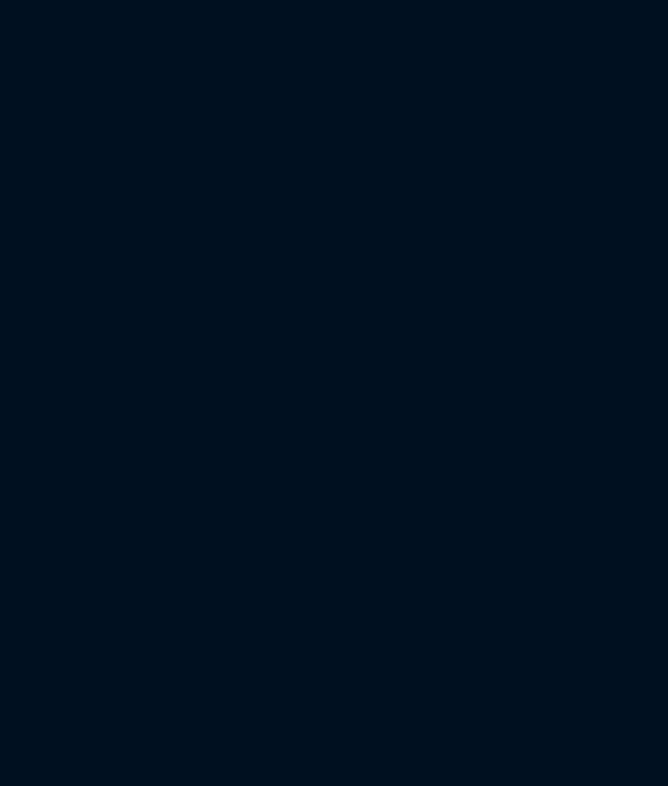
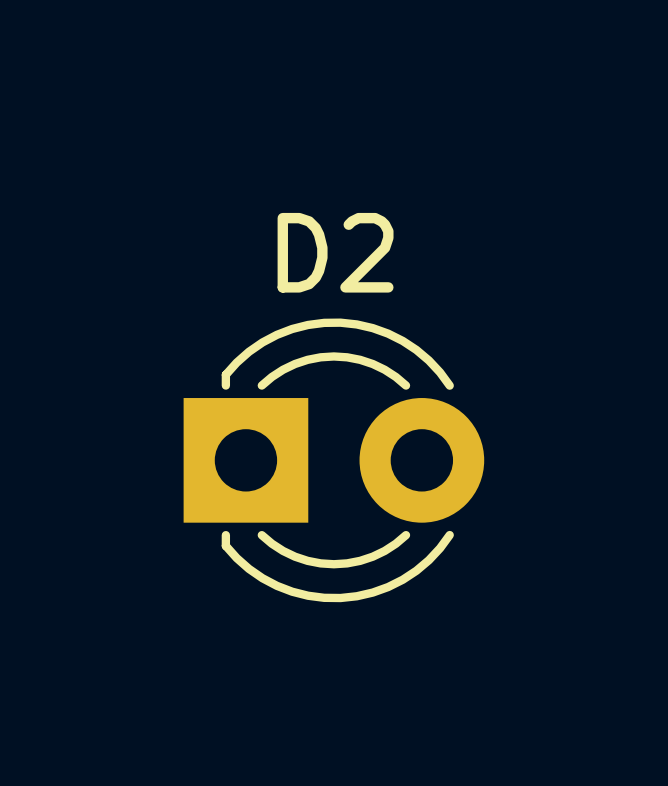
D2: none -> (333, 460)

